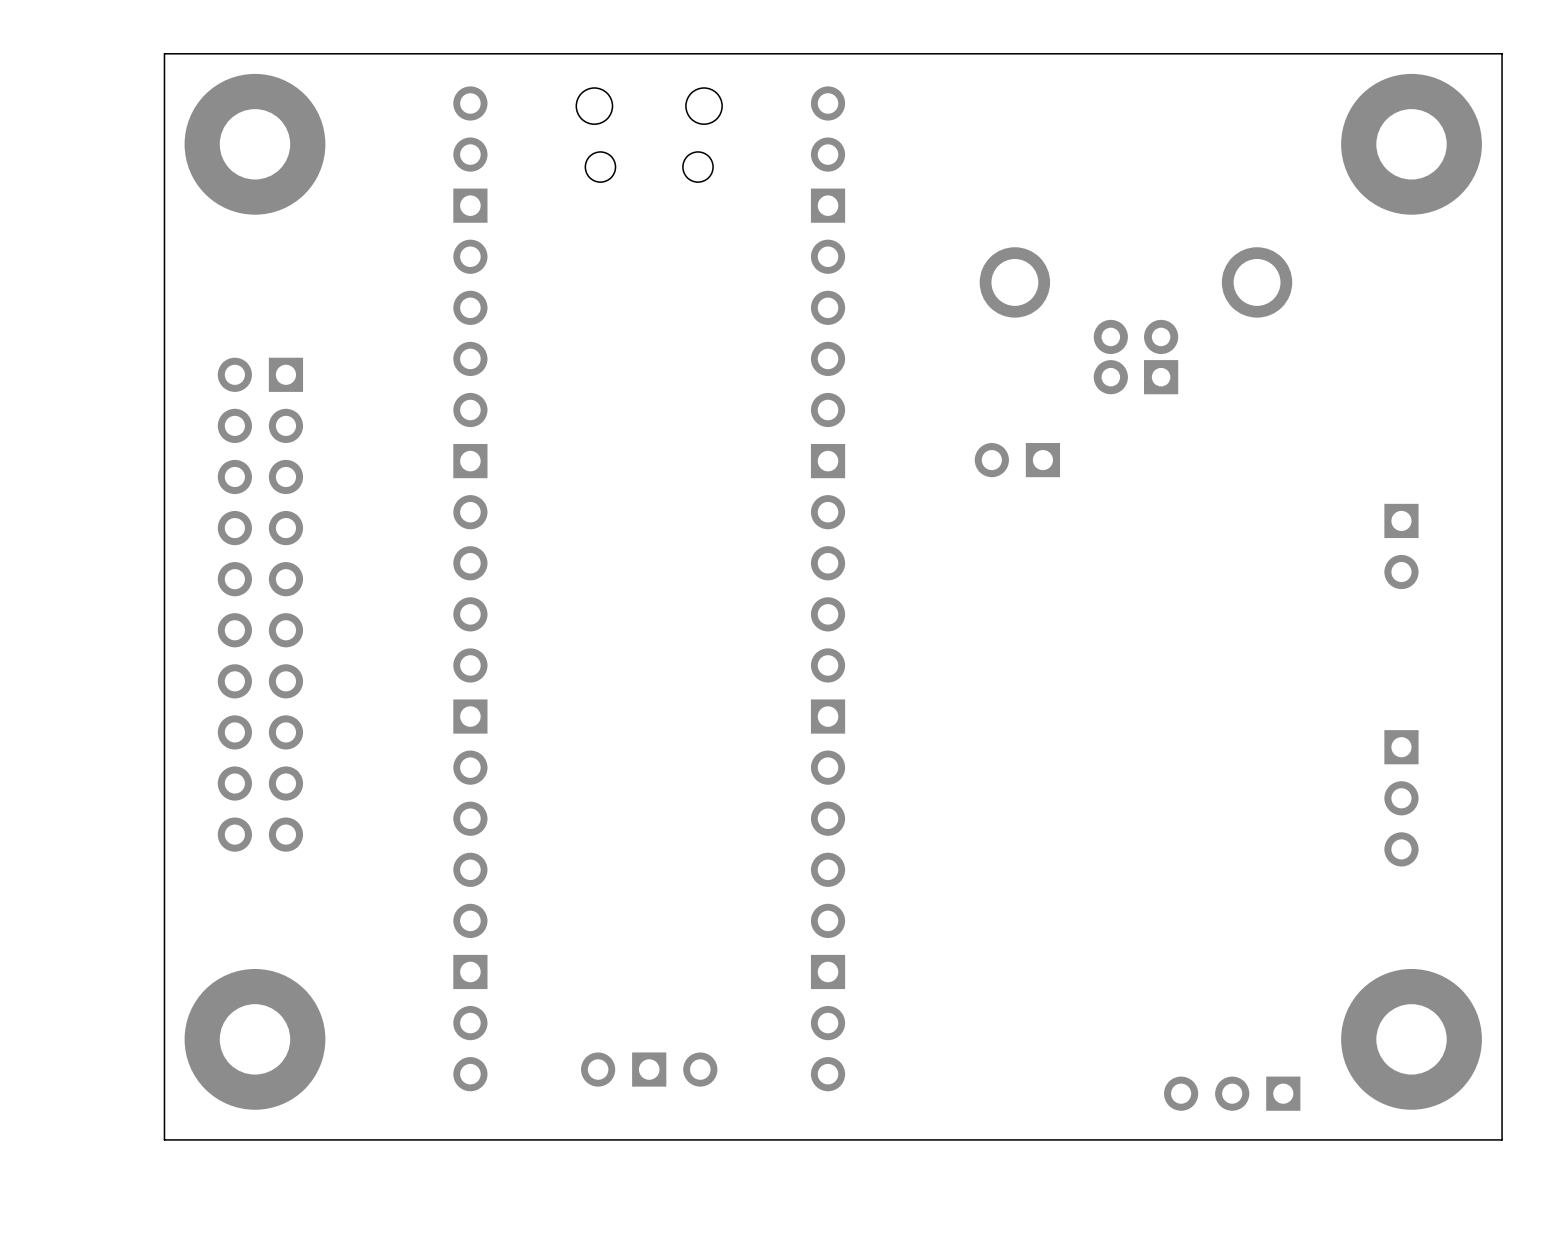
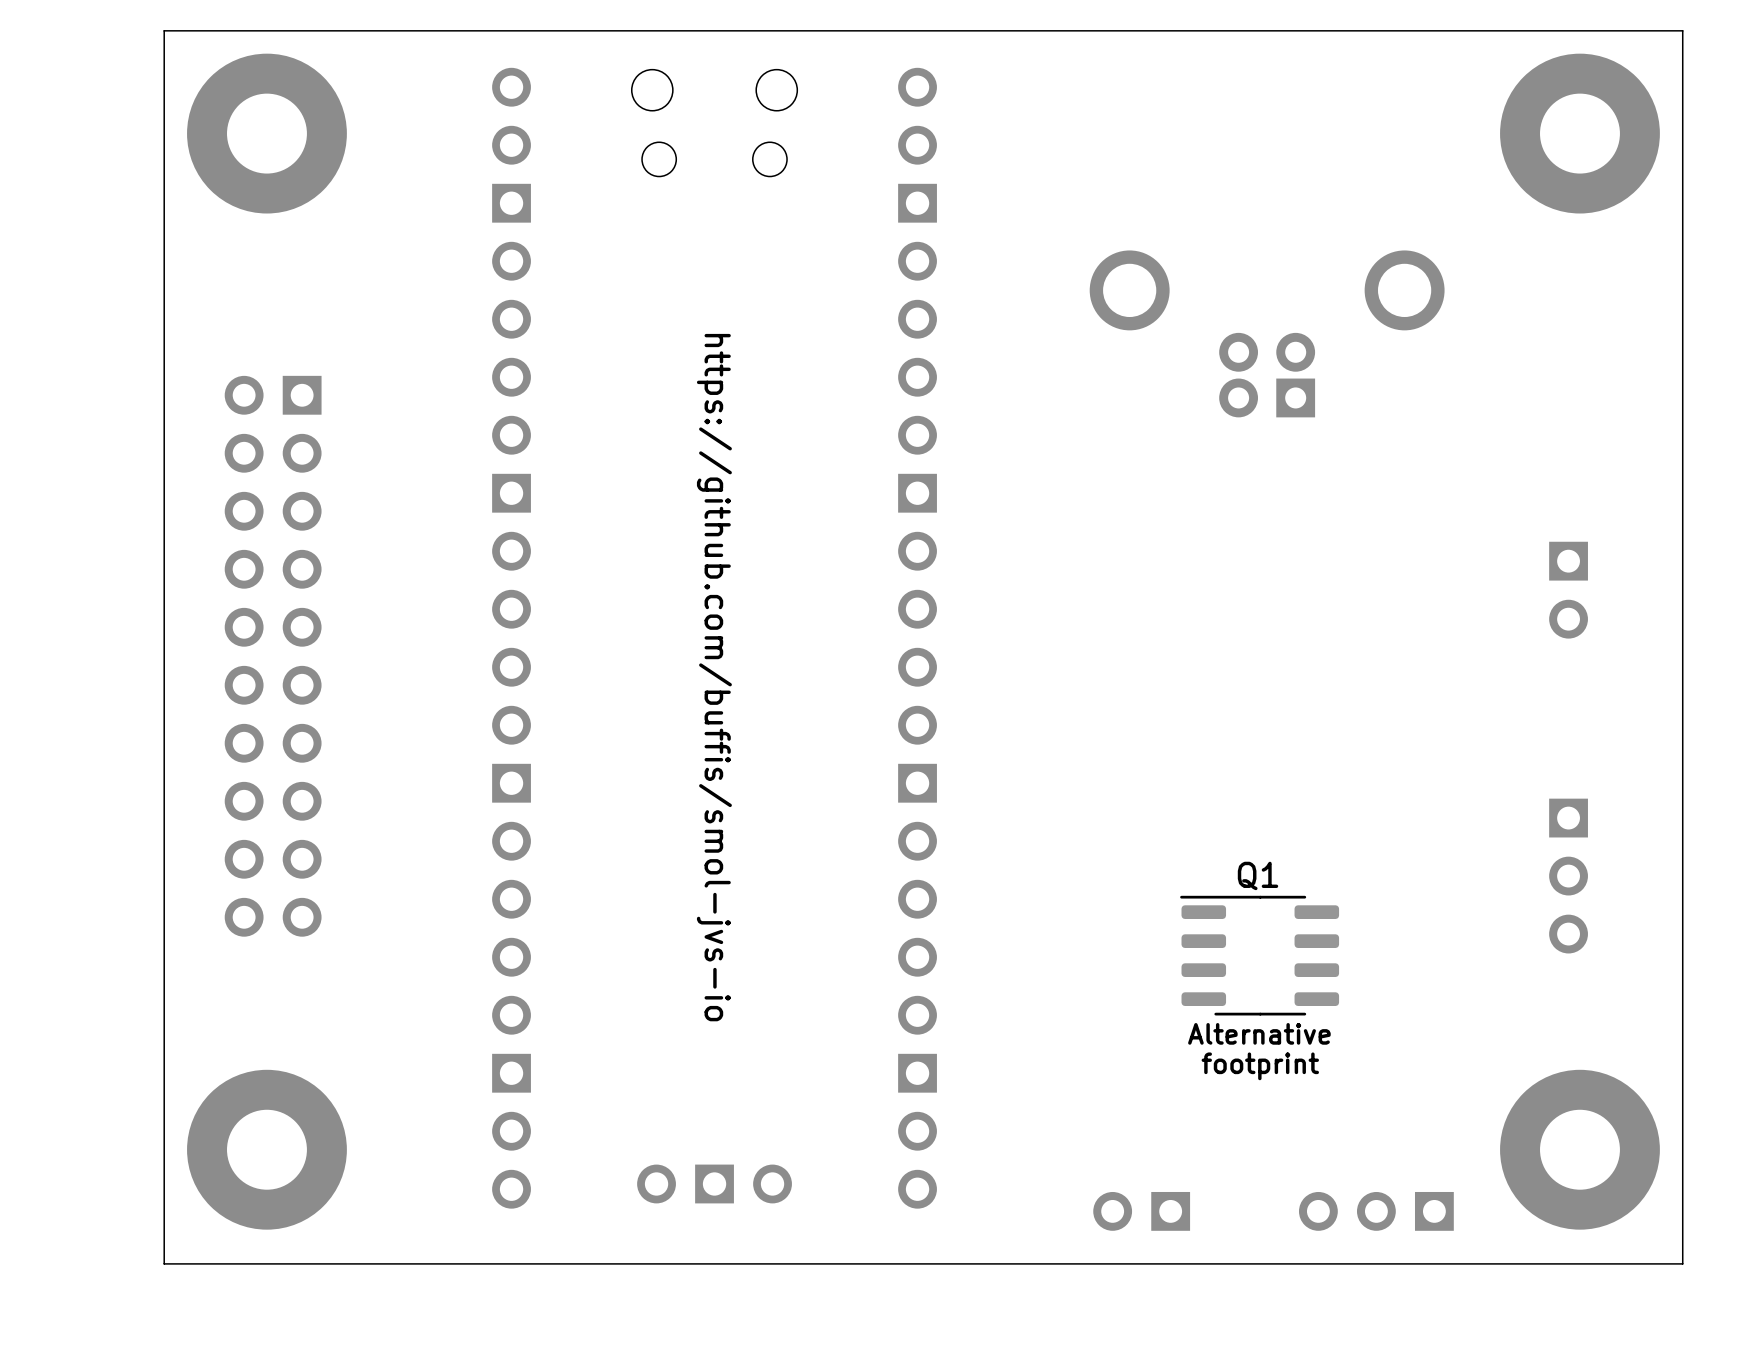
part: (1017, 460) -> none
text: none -> https://github.com/buffis/smol-jvs-io (714, 677)
Q1: none -> (1259, 955)
text: none -> Alternative (1259, 1033)
text: none -> footprint (1260, 1066)
part: none -> (1141, 1211)

